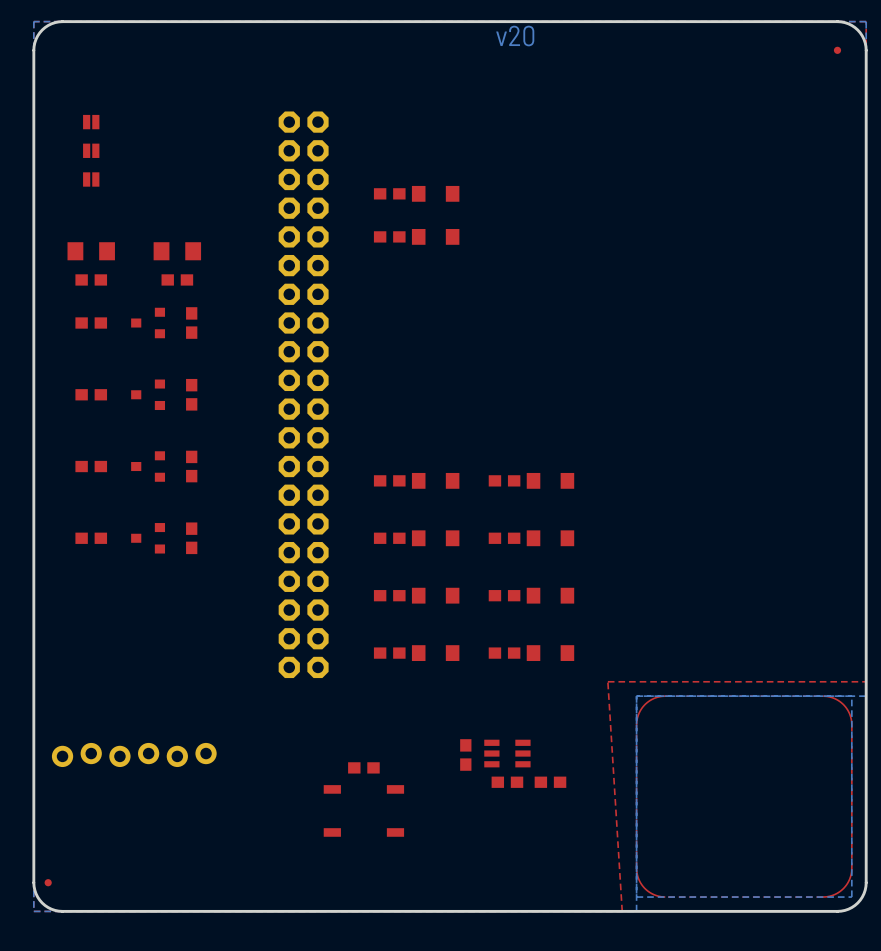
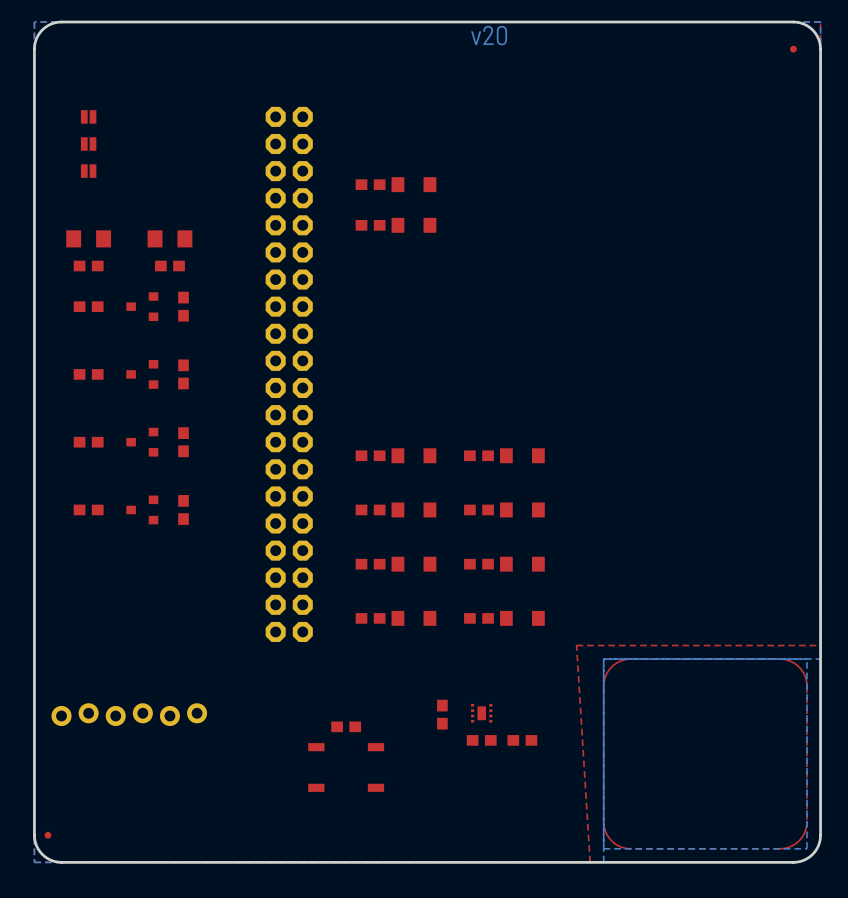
part footprint: [484, 739, 531, 768] -> [471, 703, 493, 723]

